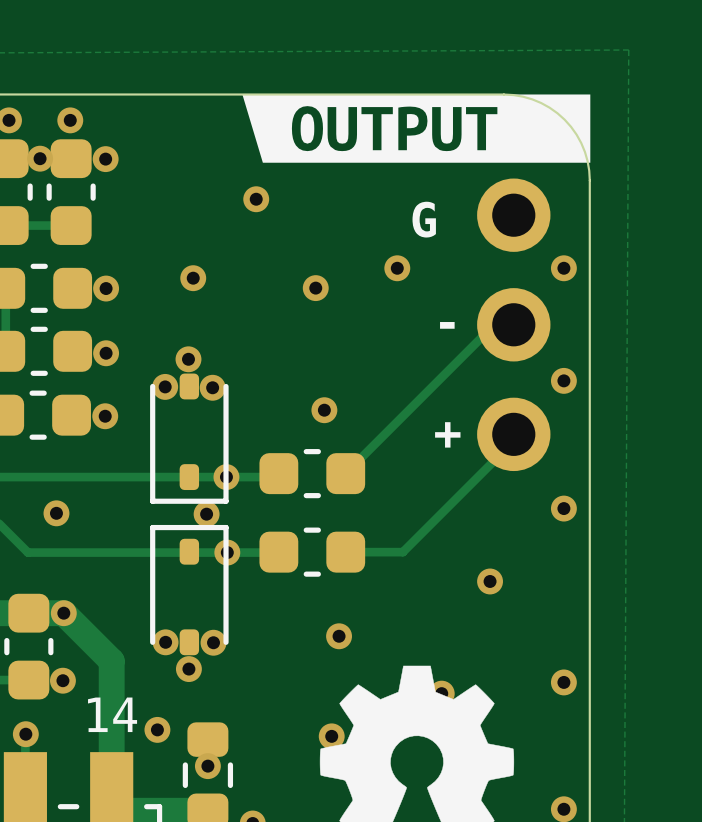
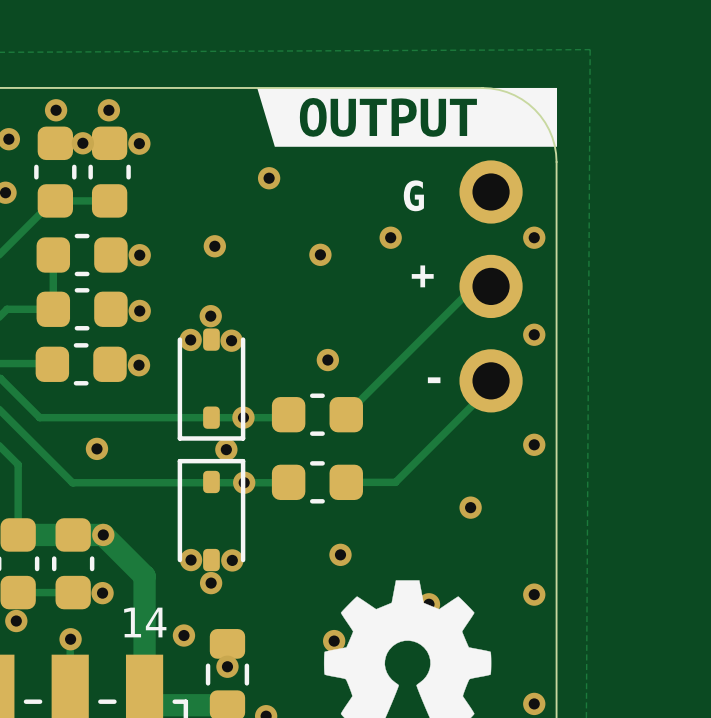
text: none -> + (422, 276)
text: - (447, 325) -> none
text: + (447, 434) -> - (434, 380)

